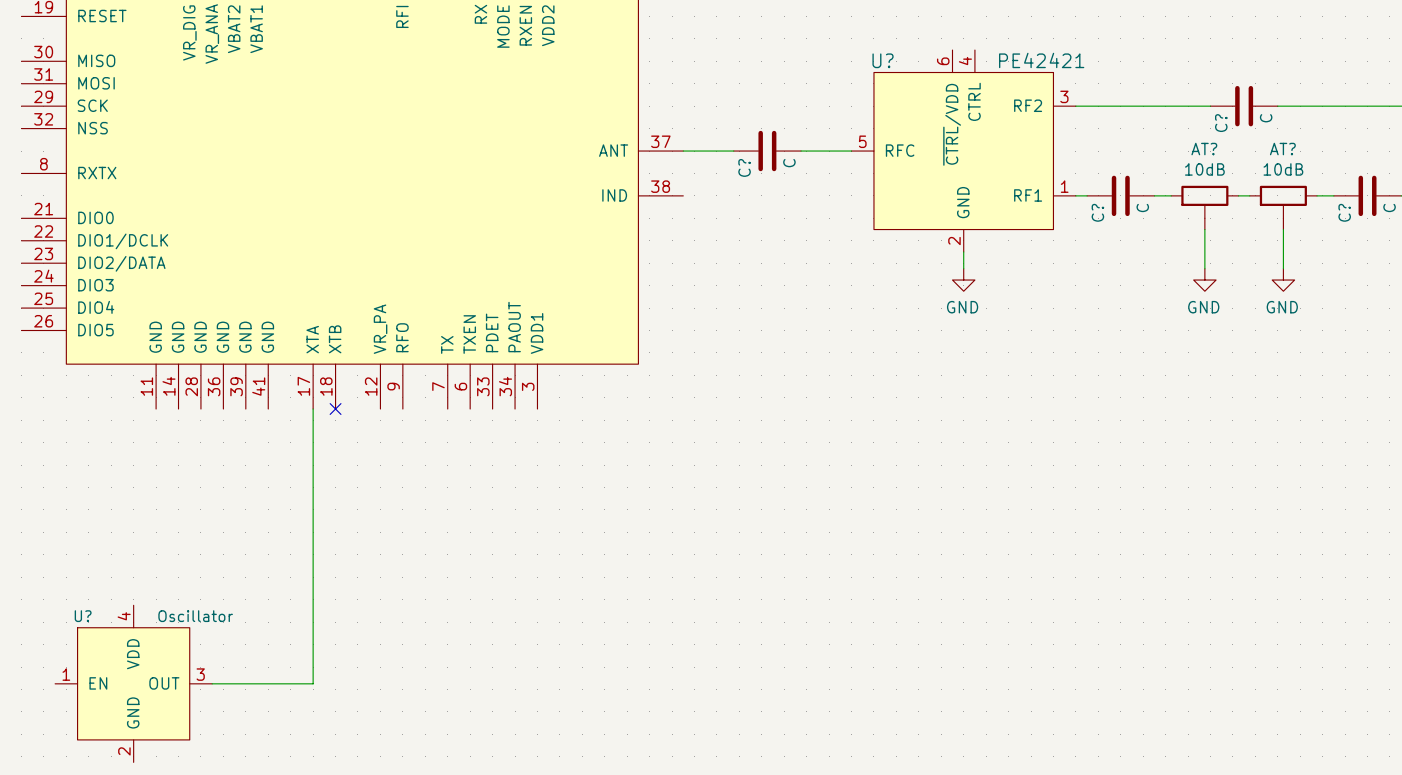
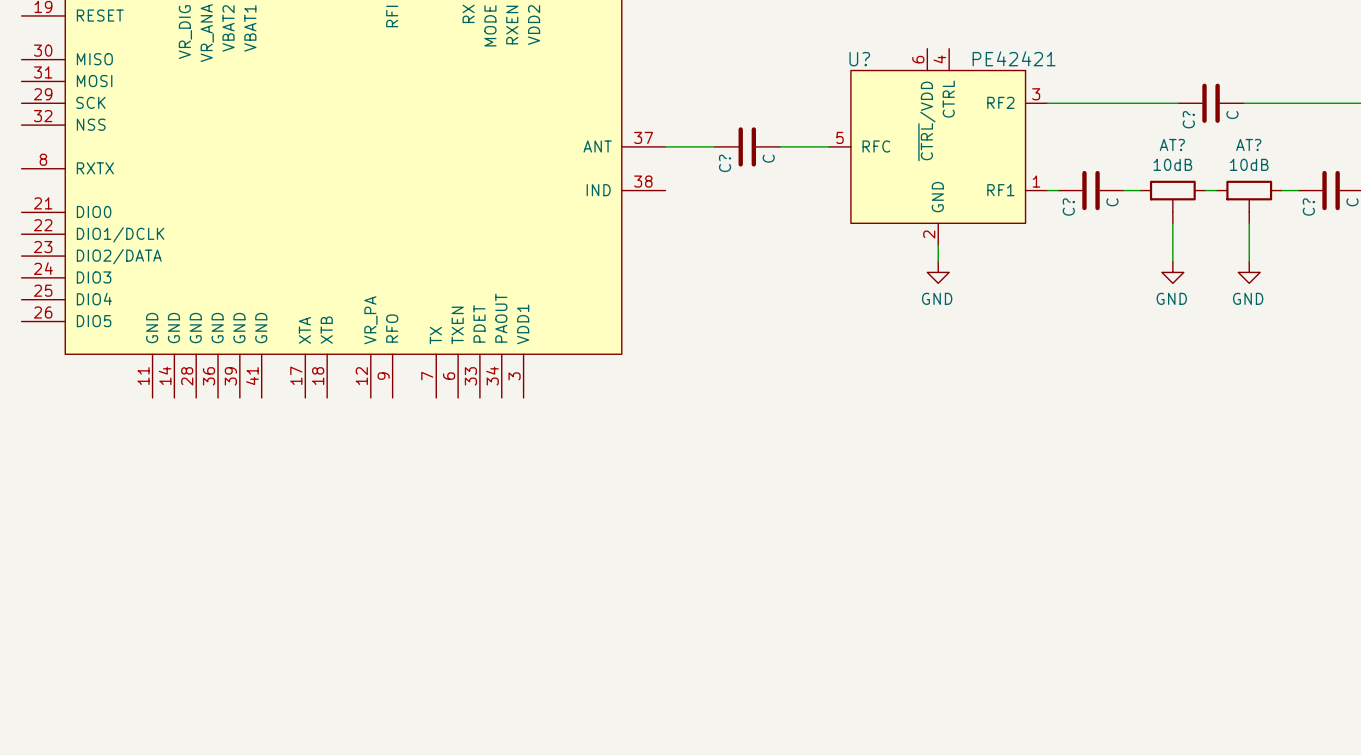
wire: (313, 409) (313, 683) (212, 683) -> none
no-connect mark: (335, 409) -> none
U?: Oscillator (133, 683) -> none

